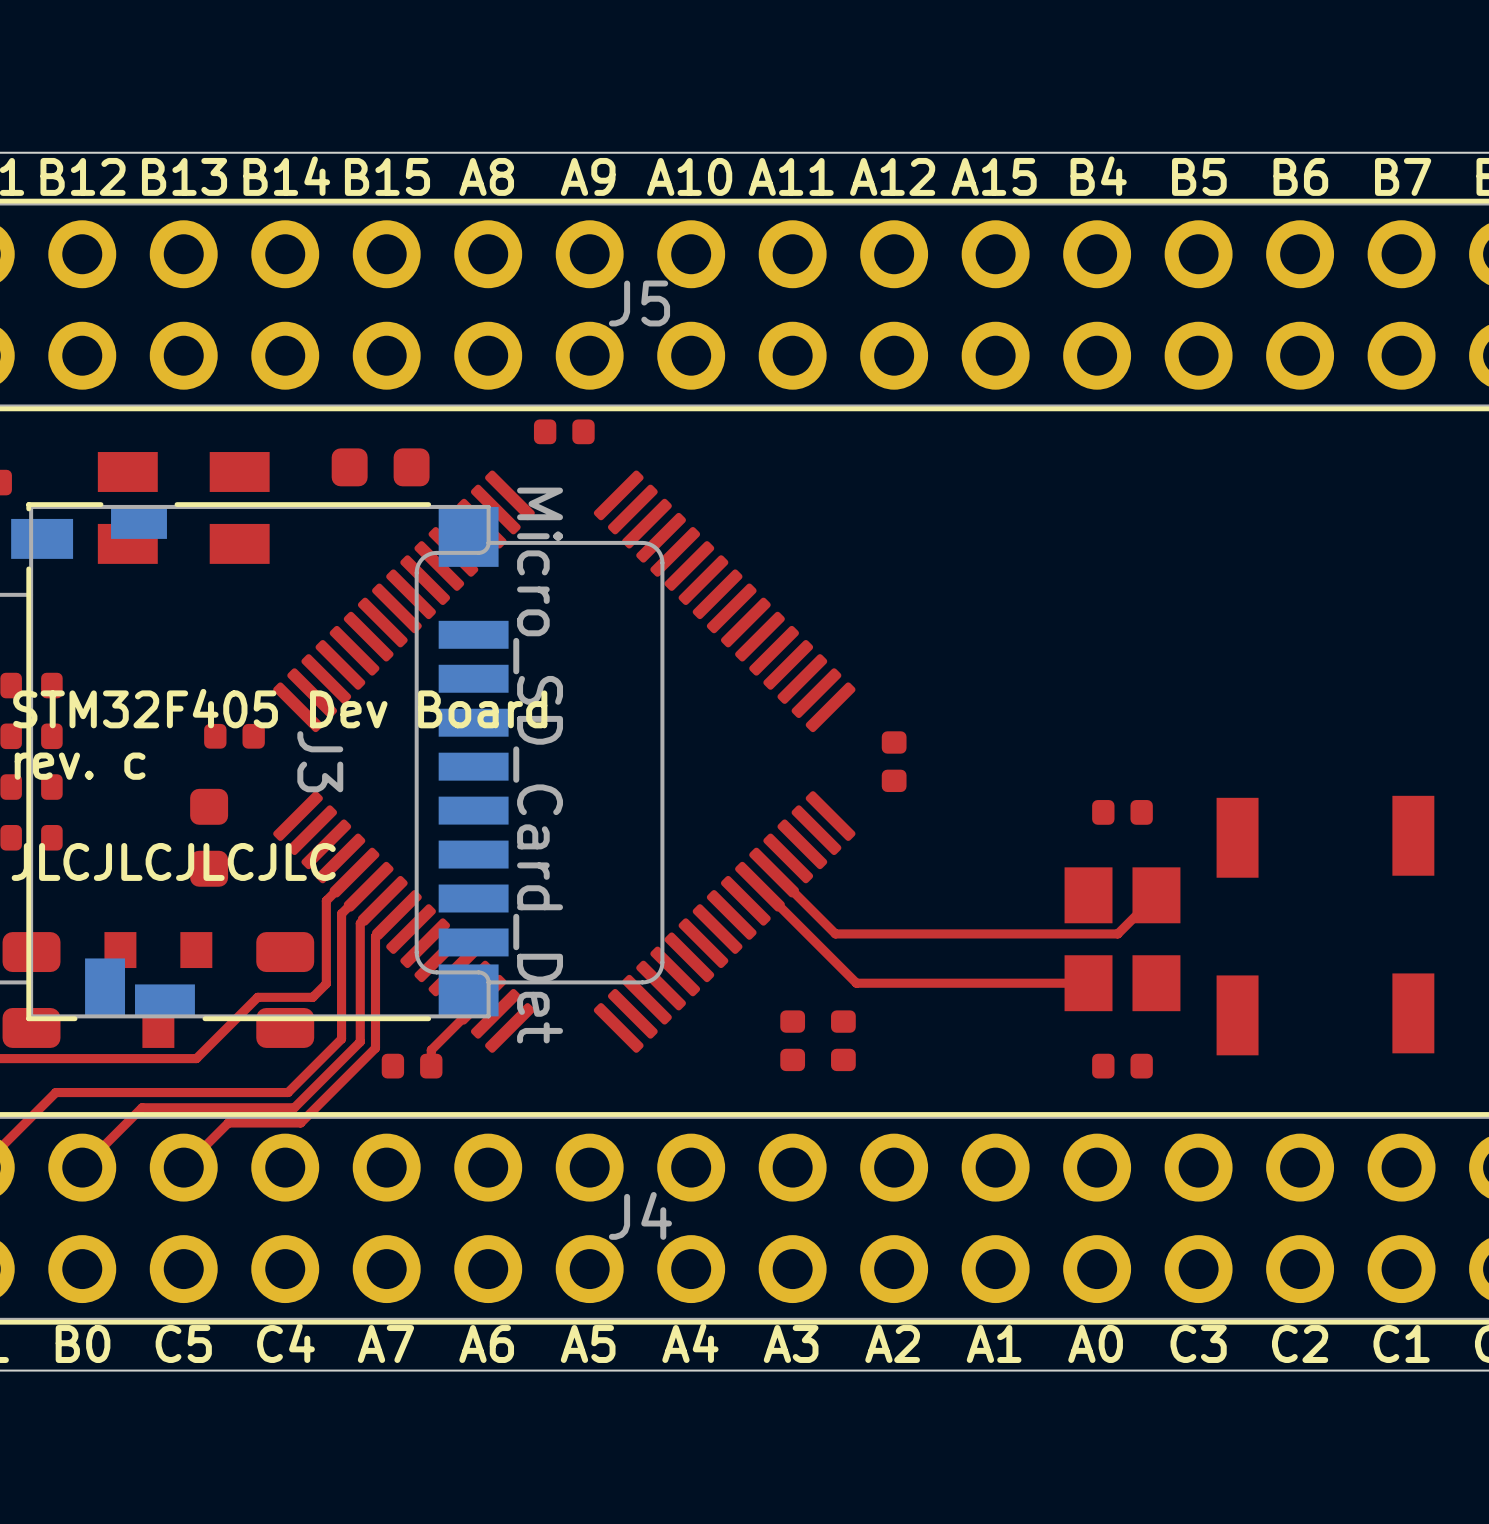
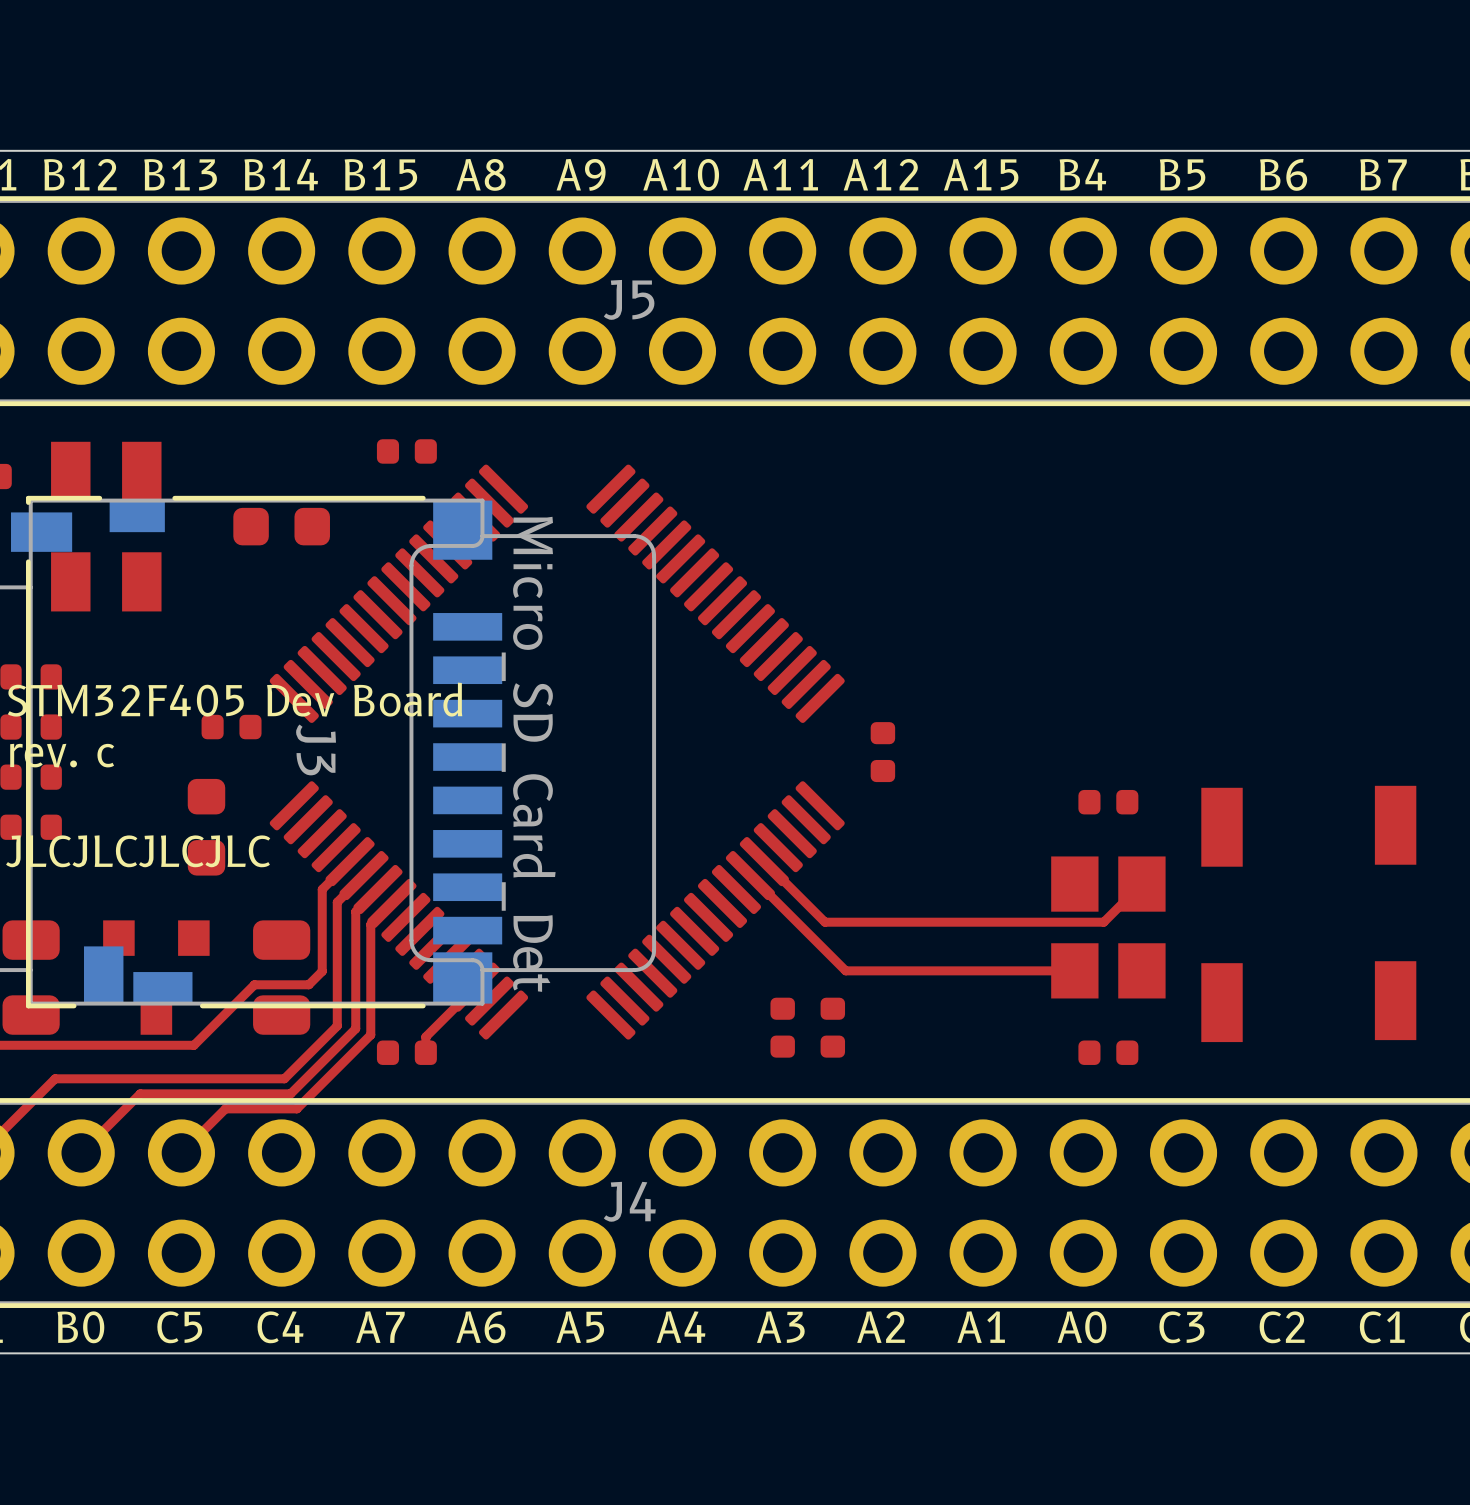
part: (564, 431) -> none
part footprint: [331, 448, 430, 487] -> [376, 439, 437, 464]
part rotation: 0° (183, 507) -> 90° clockwise (106, 526)
part: none -> (281, 526)

